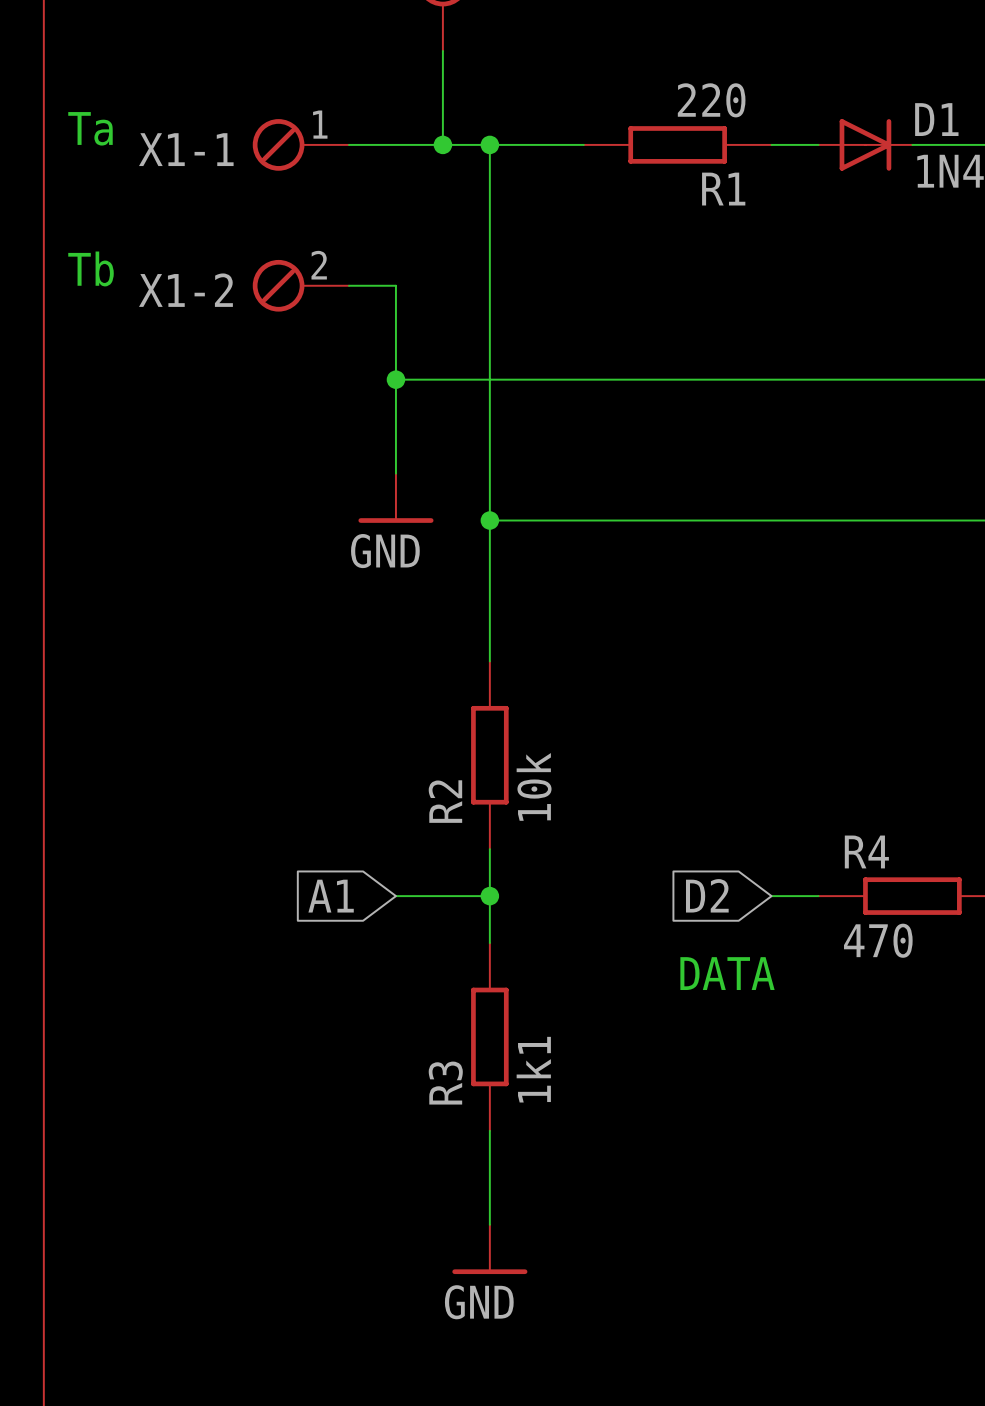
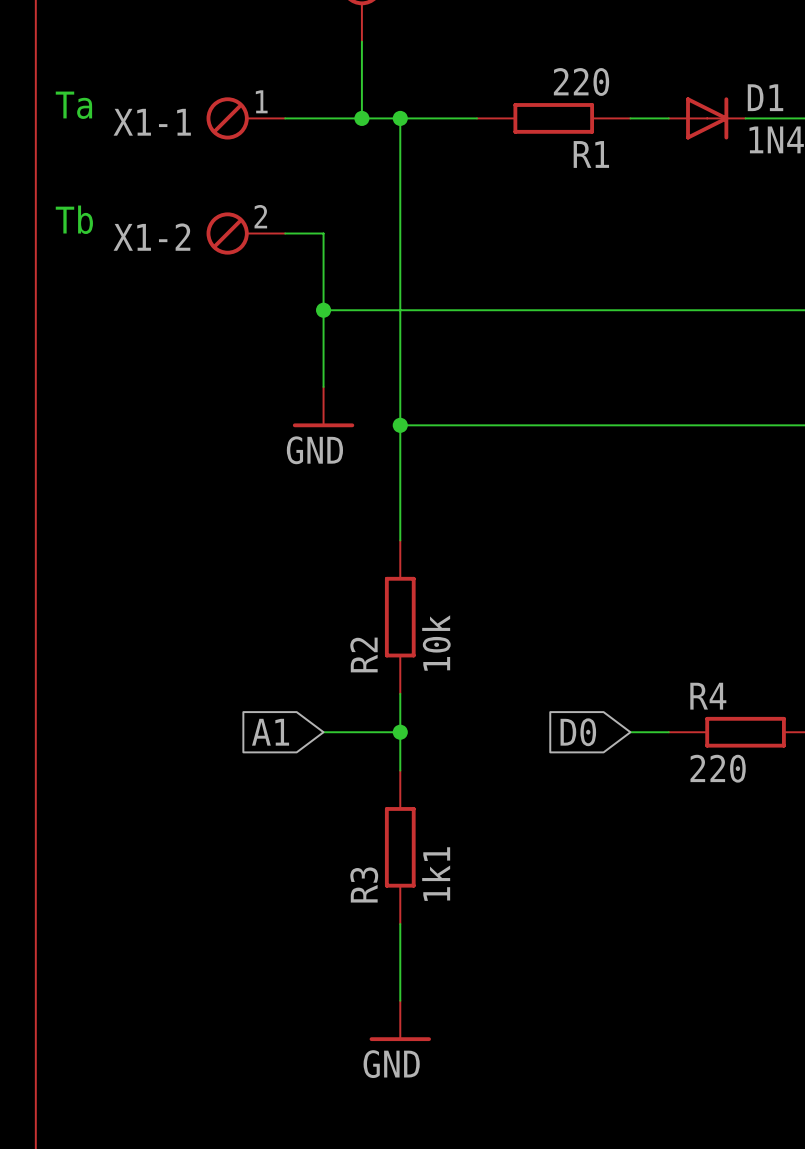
global label: D2 (707, 895) -> D0 (578, 732)
R4 value: 470 (878, 940) -> 220 (718, 768)
text: DATA (727, 973) -> none

